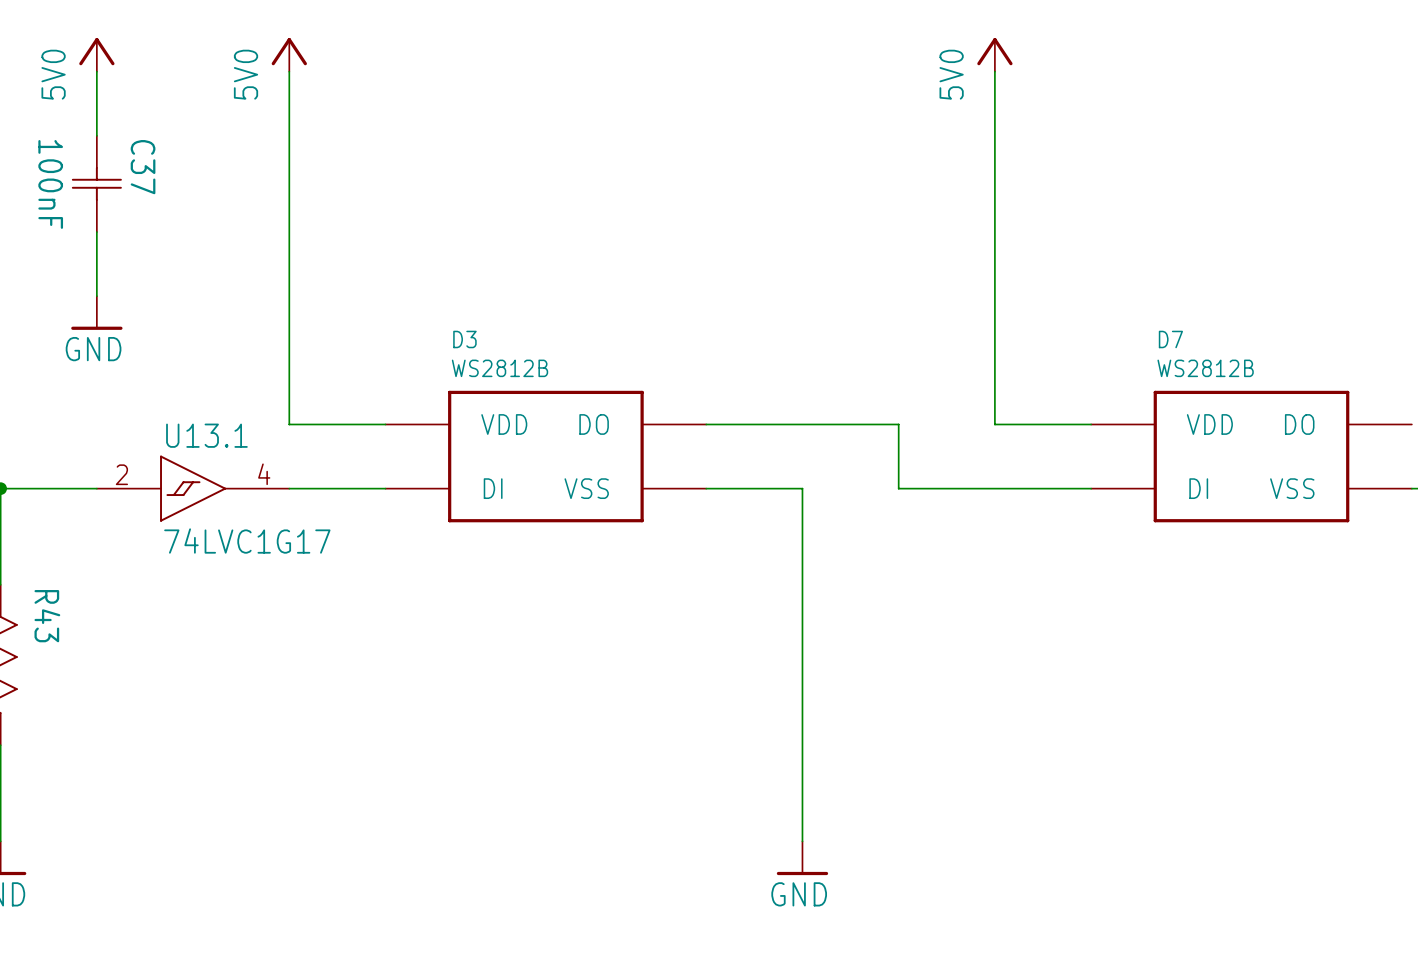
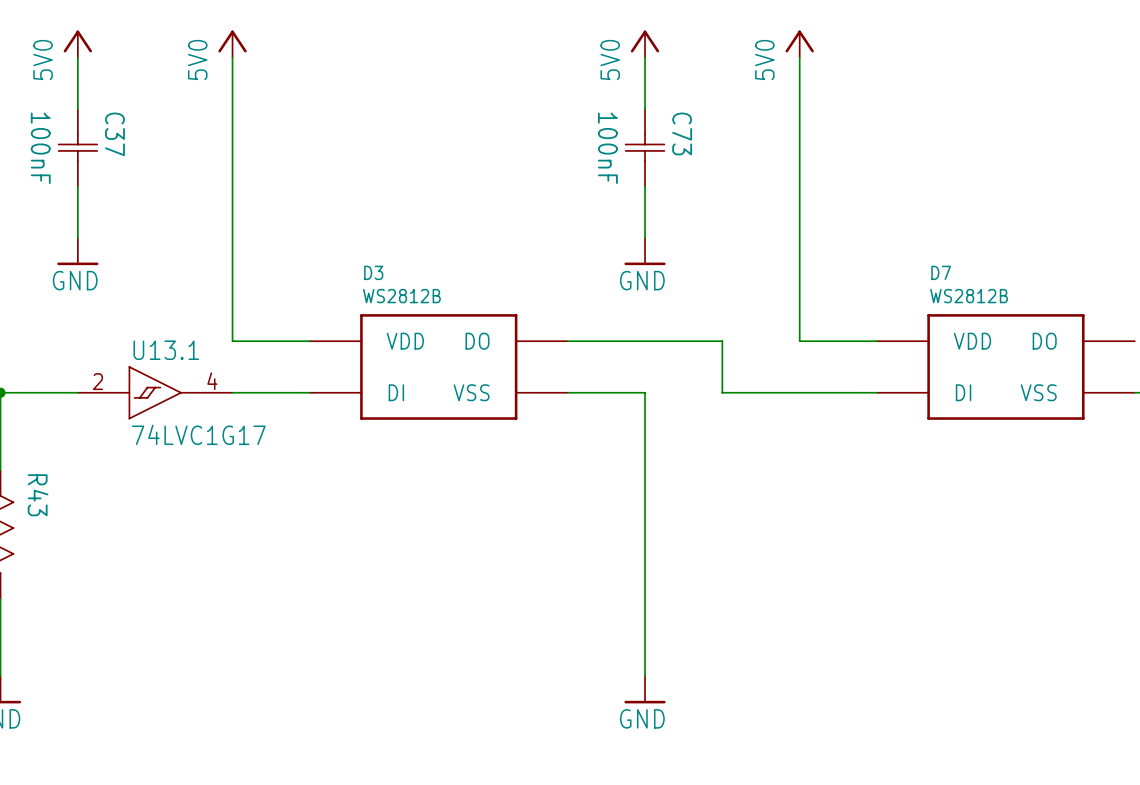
power symbol: none -> 5V0 (645, 44)
wire: none -> (645, 57) (645, 109)
C73: none -> 100nF (645, 147)
wire: none -> (645, 186) (645, 238)
power symbol: none -> GND (645, 251)

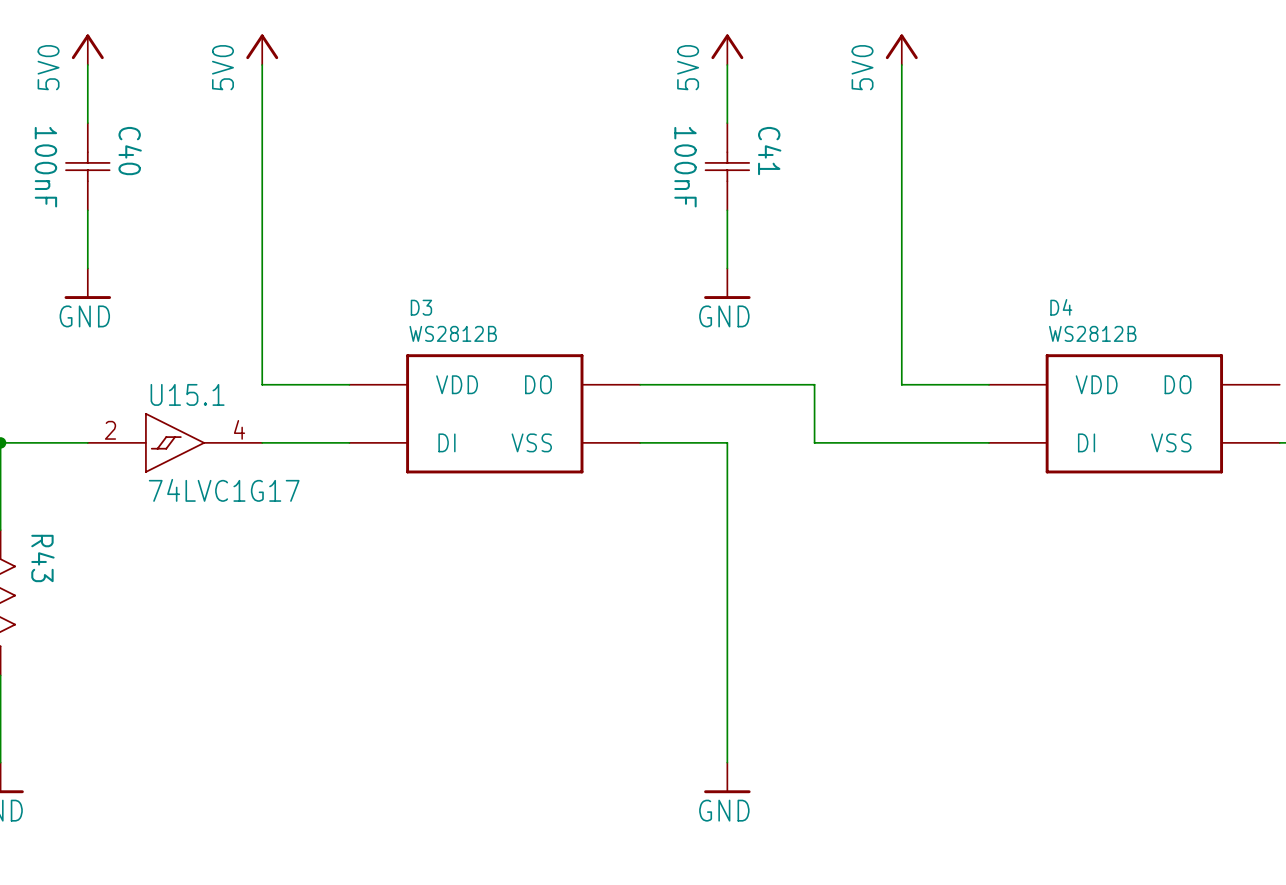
C73 name: C73 (682, 133) -> C41 (769, 151)
C37 name: C37 (114, 134) -> C40 (130, 151)
D7 name: D7 (941, 272) -> D4 (1061, 307)
U13.1 name: U13.1 (166, 350) -> U15.1 (187, 394)

